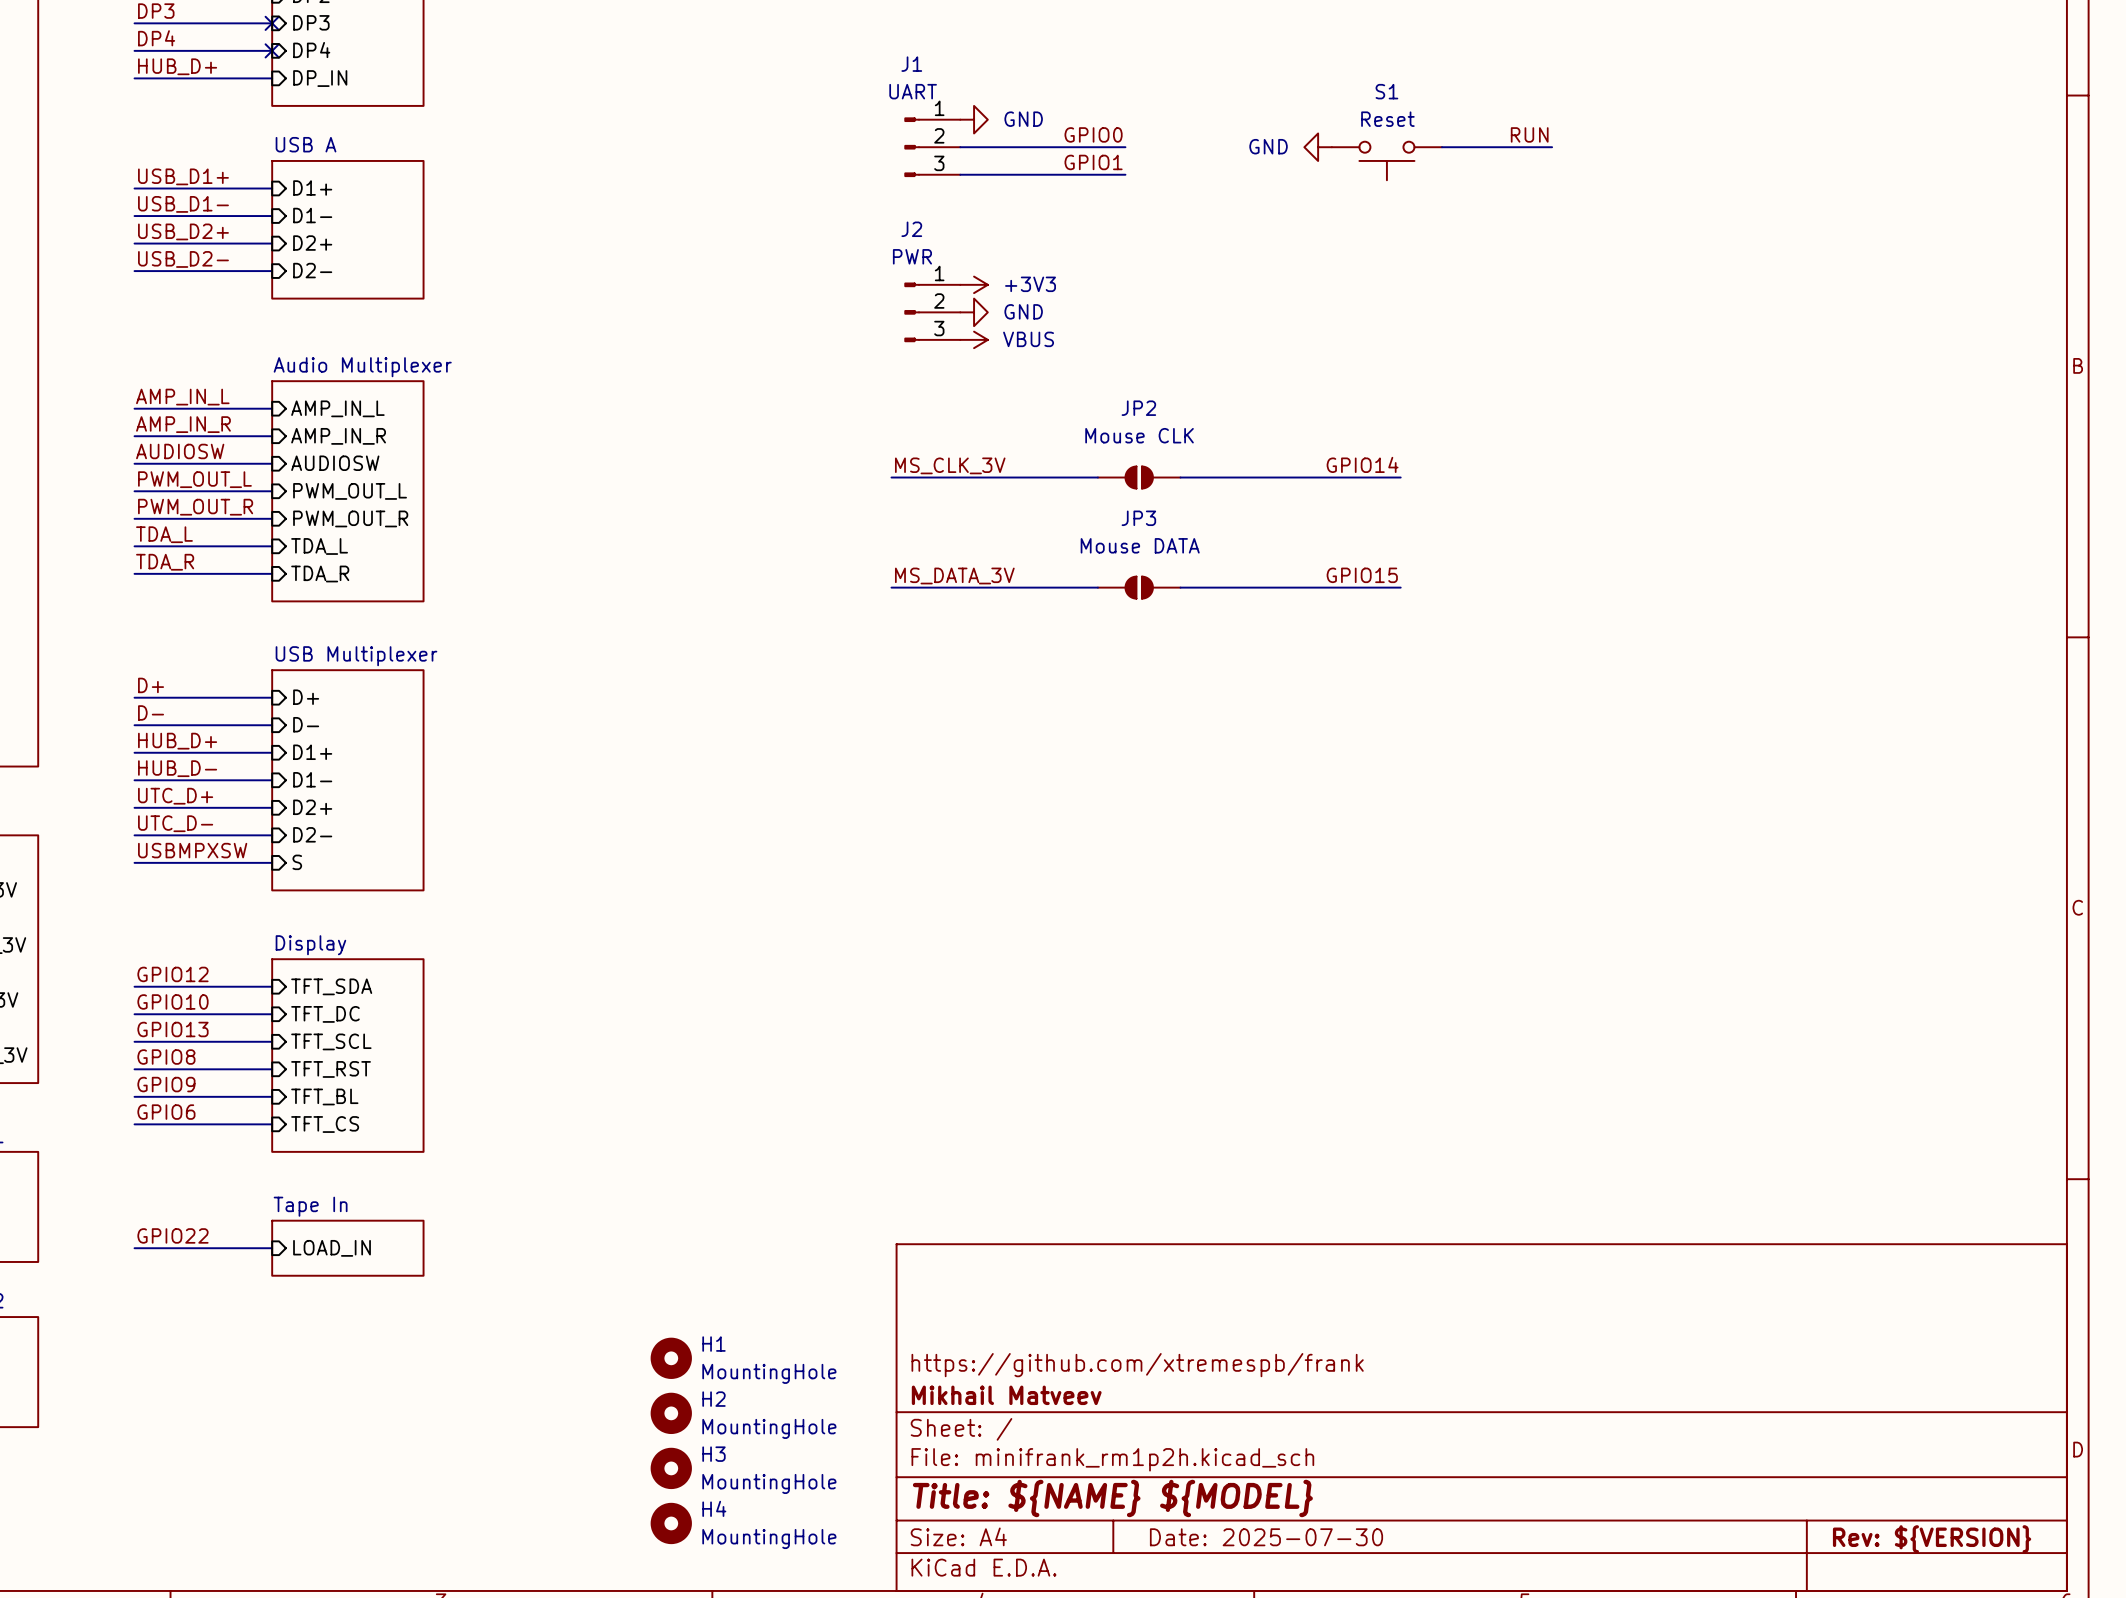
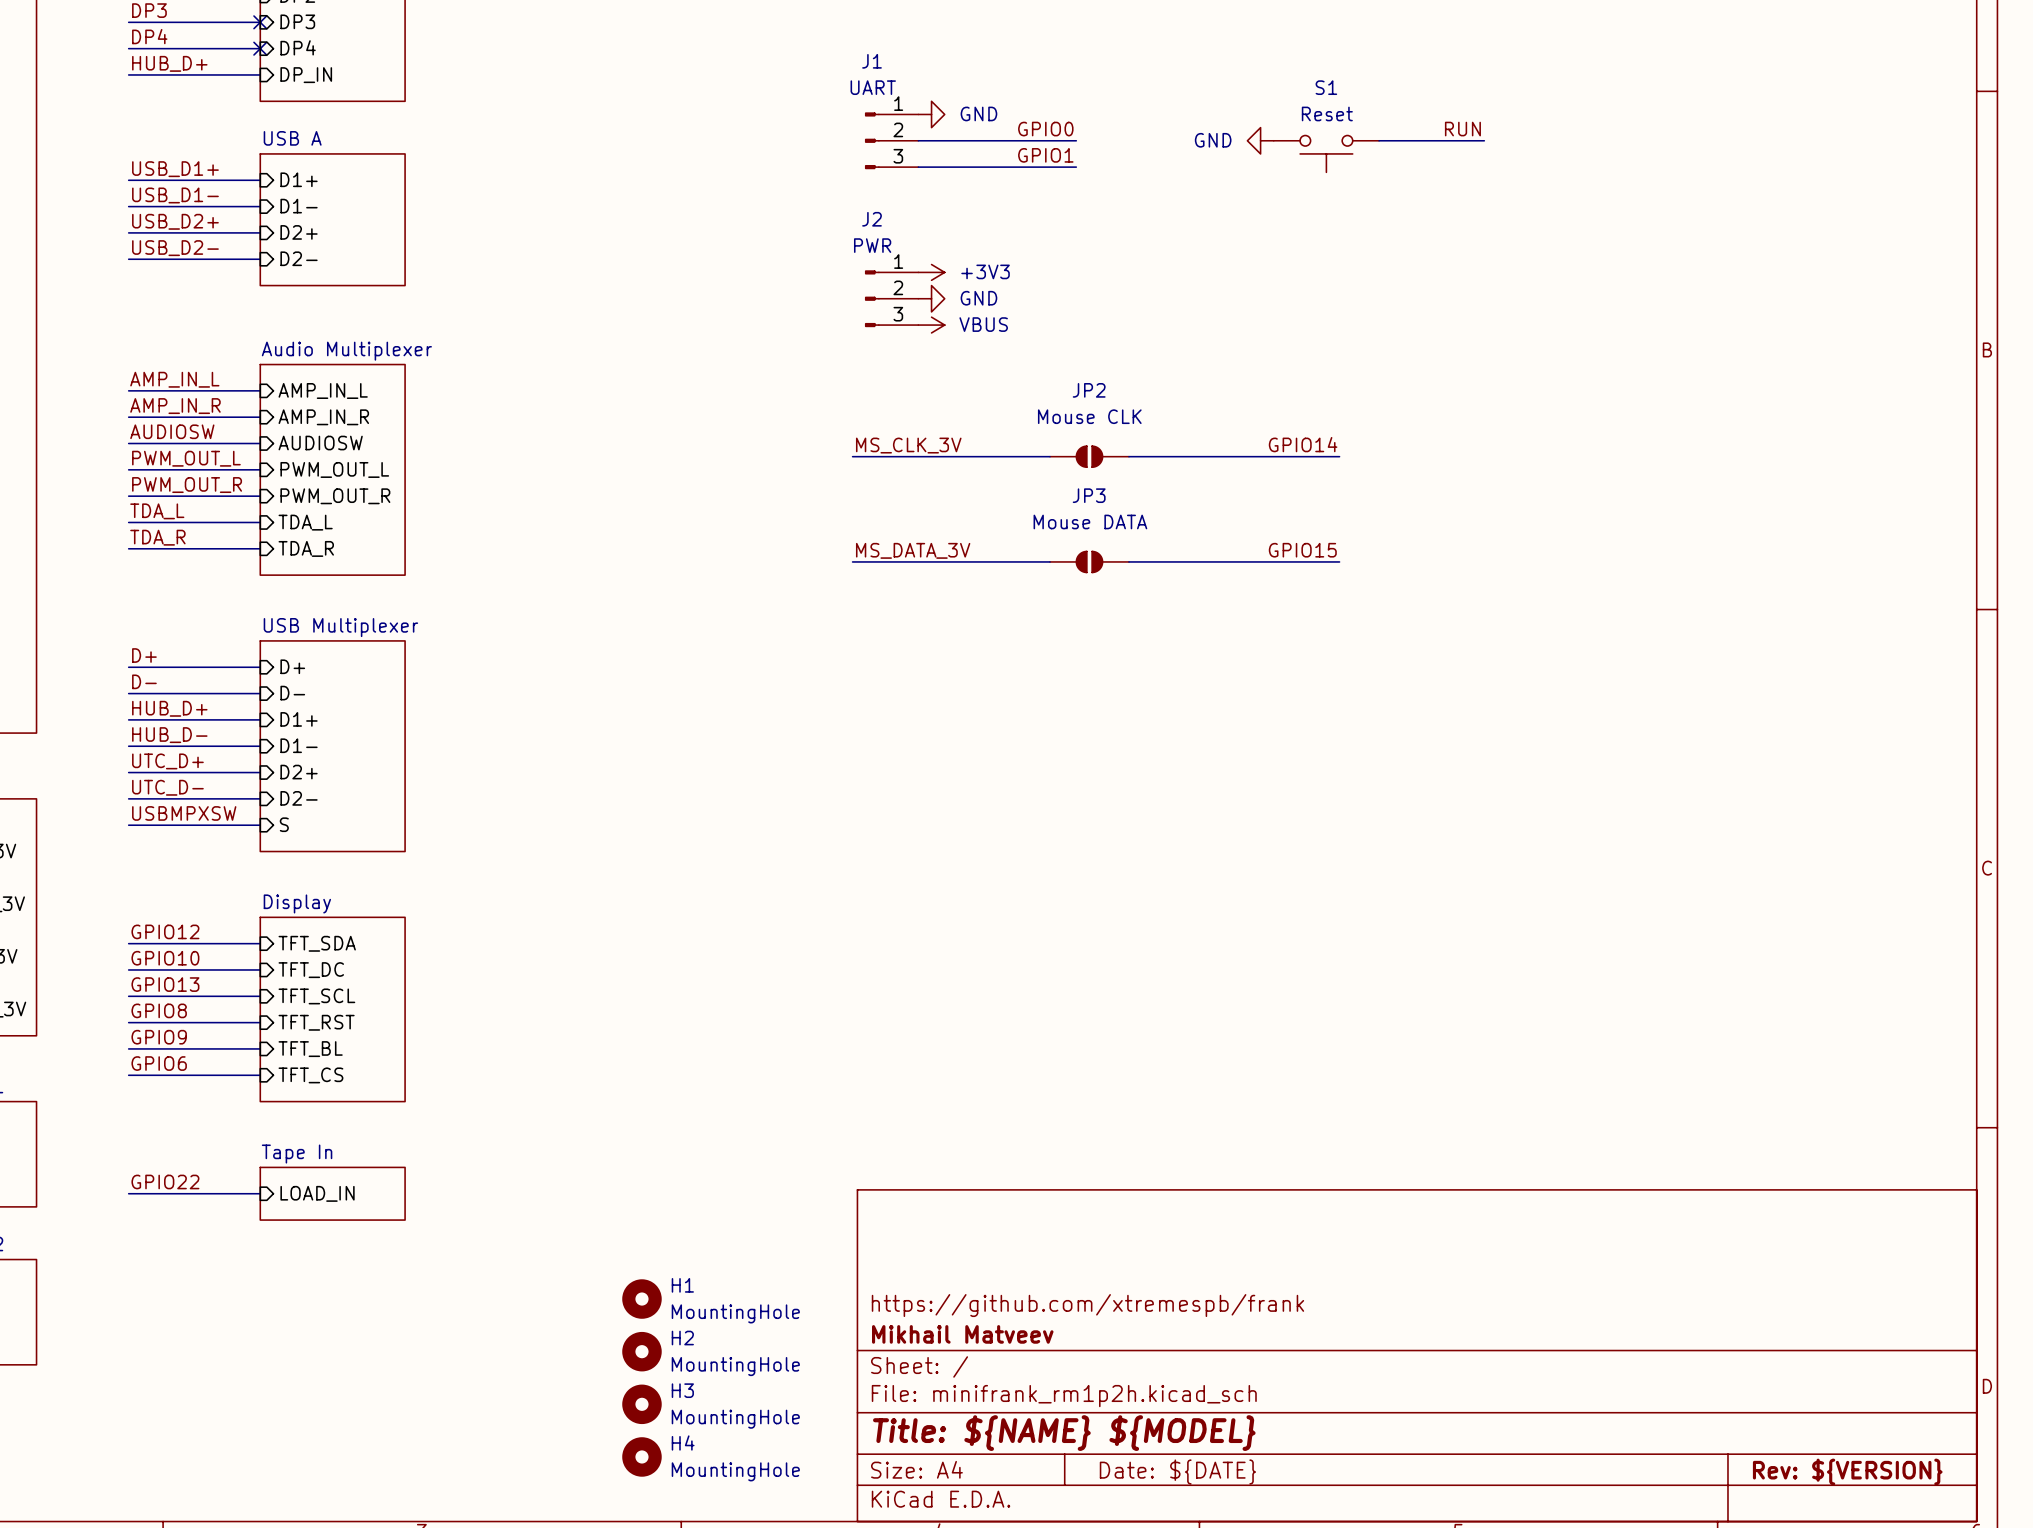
title block: Date: 2025-07-30 (1266, 1537) -> Date: ${DATE} (1177, 1472)

